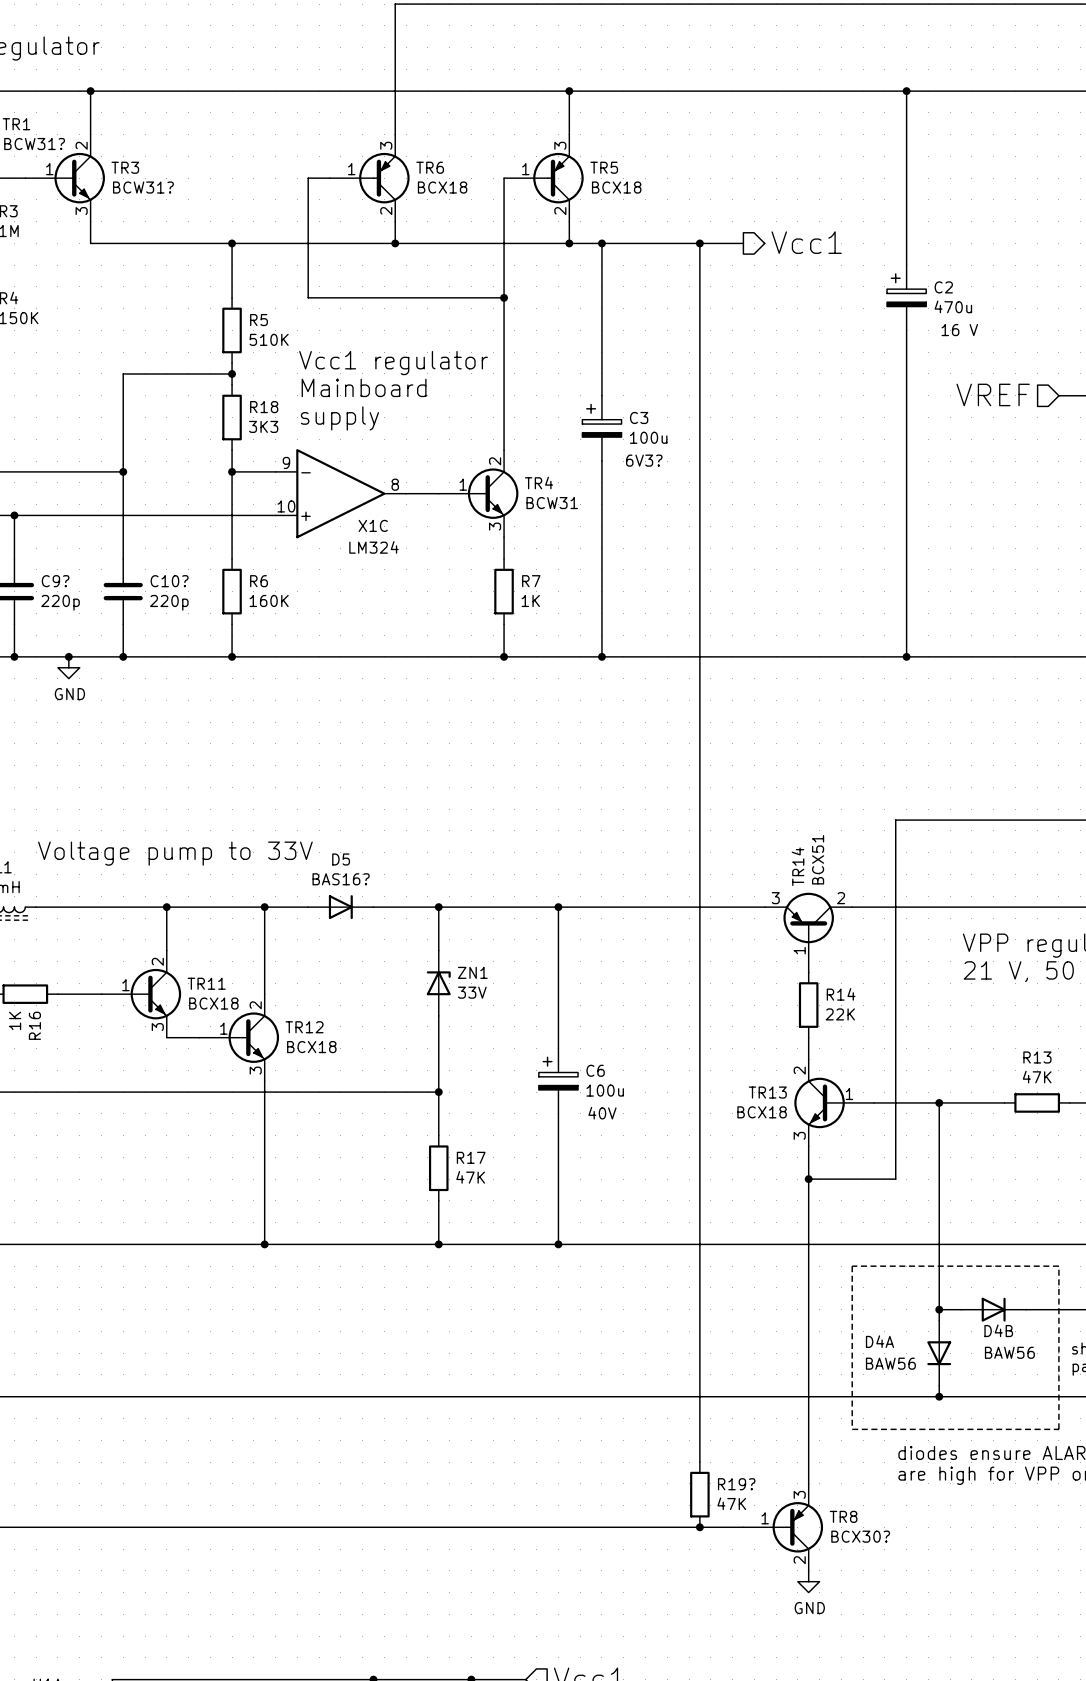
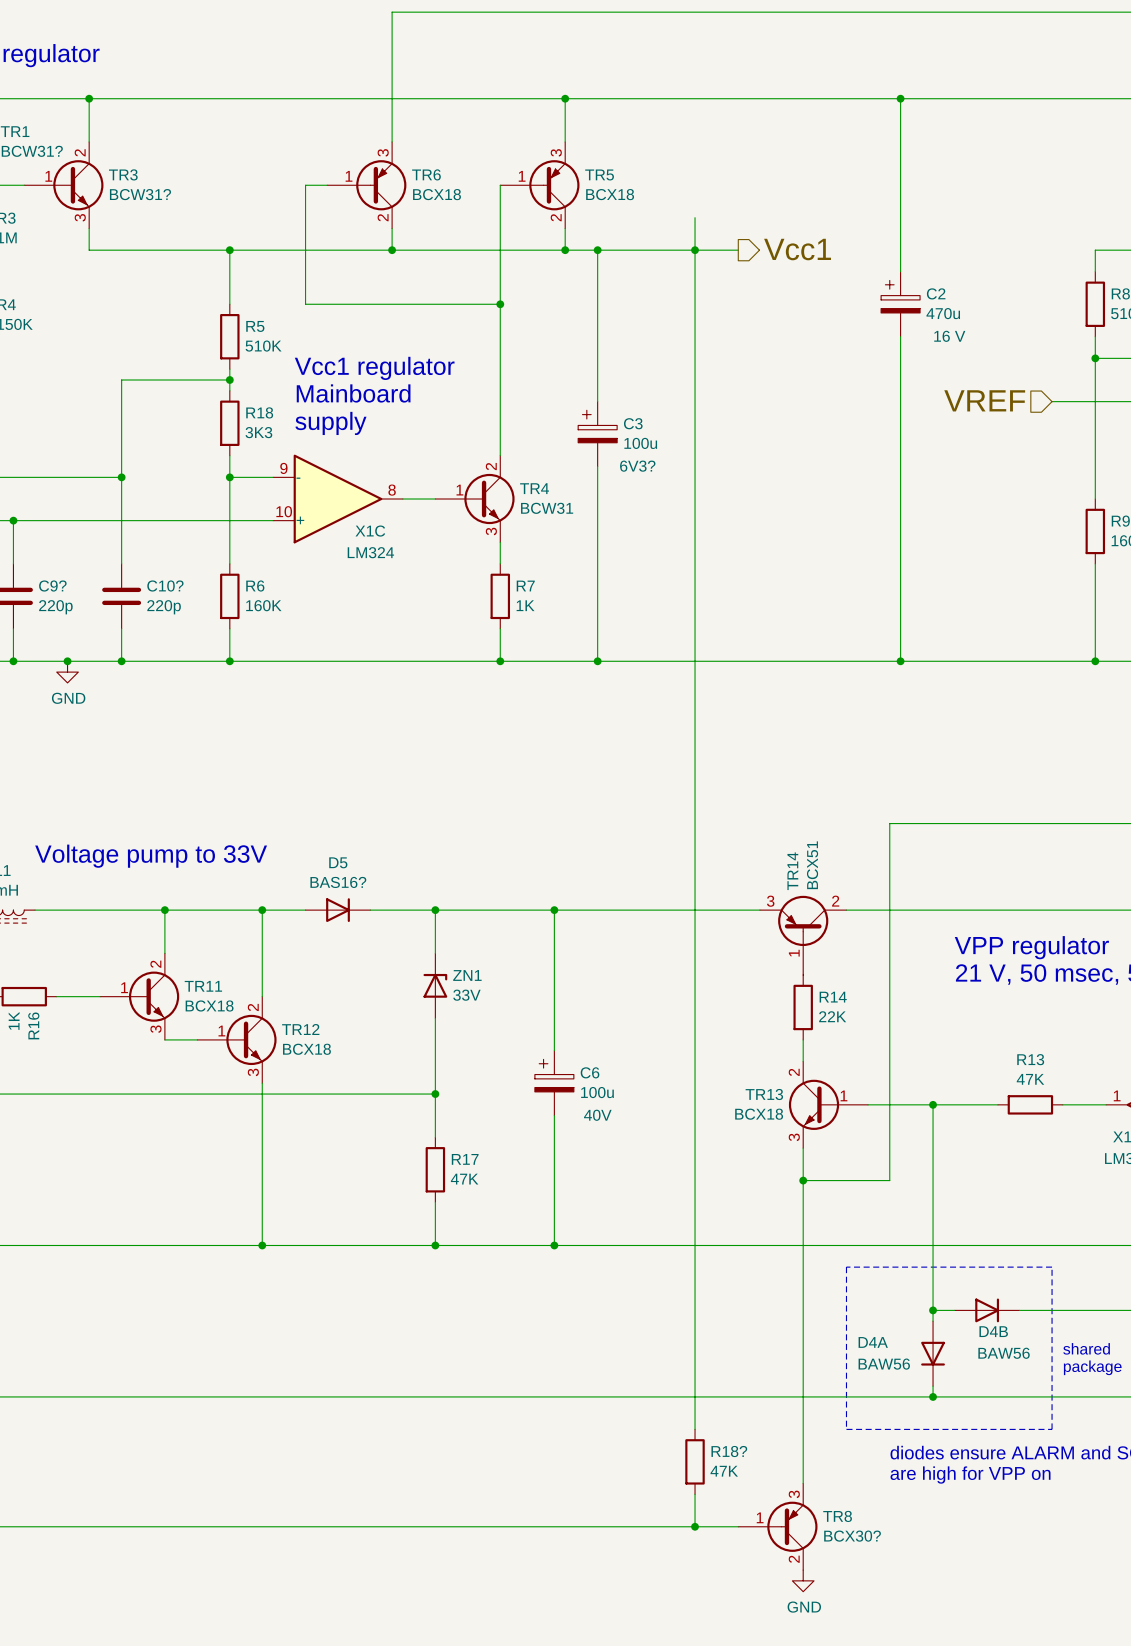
wire: none -> (695, 217) (695, 250)
wire: (699, 1429) (699, 1462) -> (695, 1494) (695, 1526)
R18?: none -> 47K (695, 1461)
R19?: 47K (699, 1494) -> none

